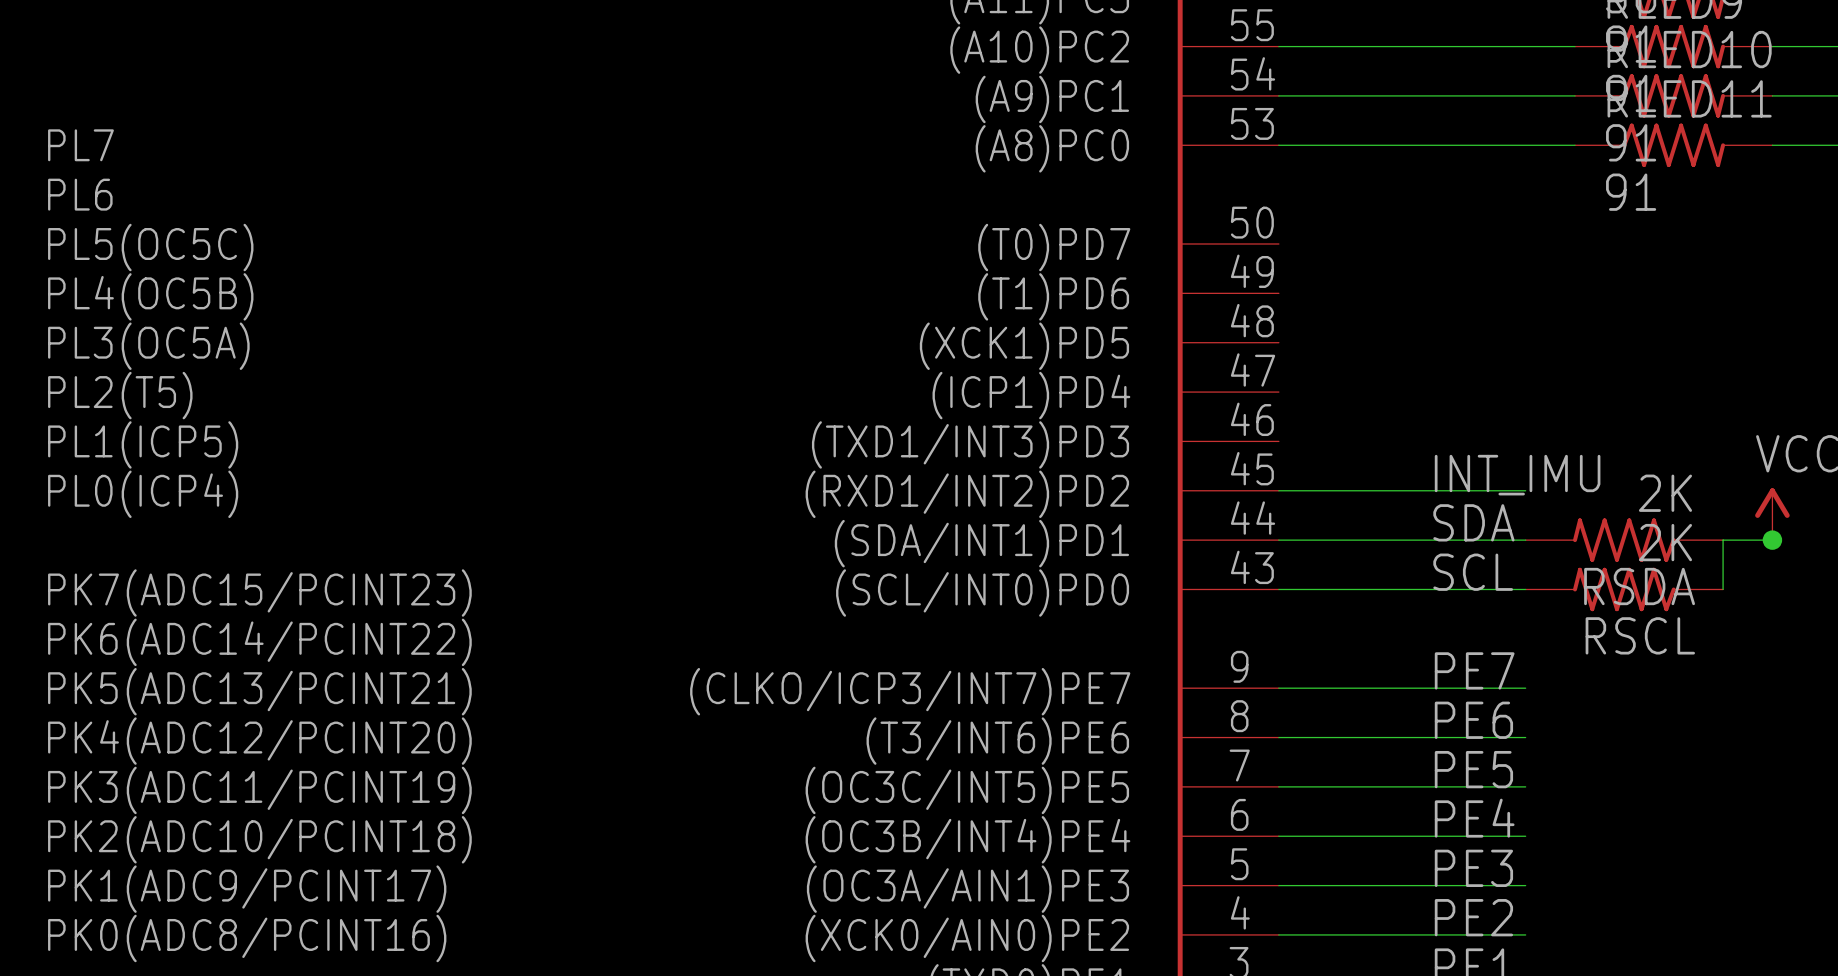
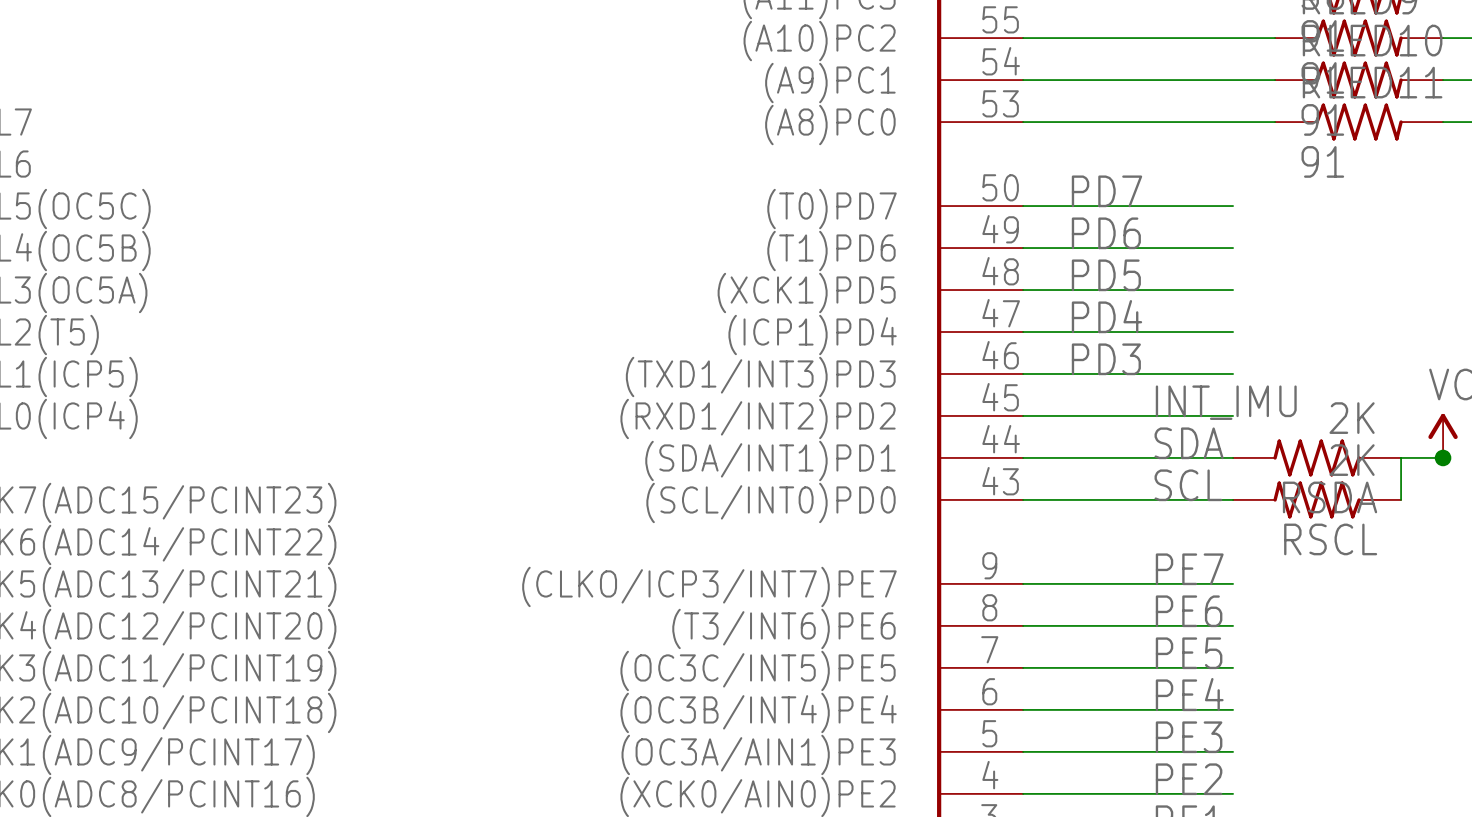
label: none -> PD7 (1106, 191)
wire: none -> (1023, 206) (1233, 206)
label: none -> PD6 (1106, 233)
wire: none -> (1023, 248) (1233, 248)
label: none -> PD5 (1106, 275)
wire: none -> (1023, 290) (1233, 290)
label: none -> PD4 (1106, 316)
wire: none -> (1023, 332) (1233, 332)
label: none -> PD3 (1106, 359)
wire: none -> (1023, 373) (1233, 373)

